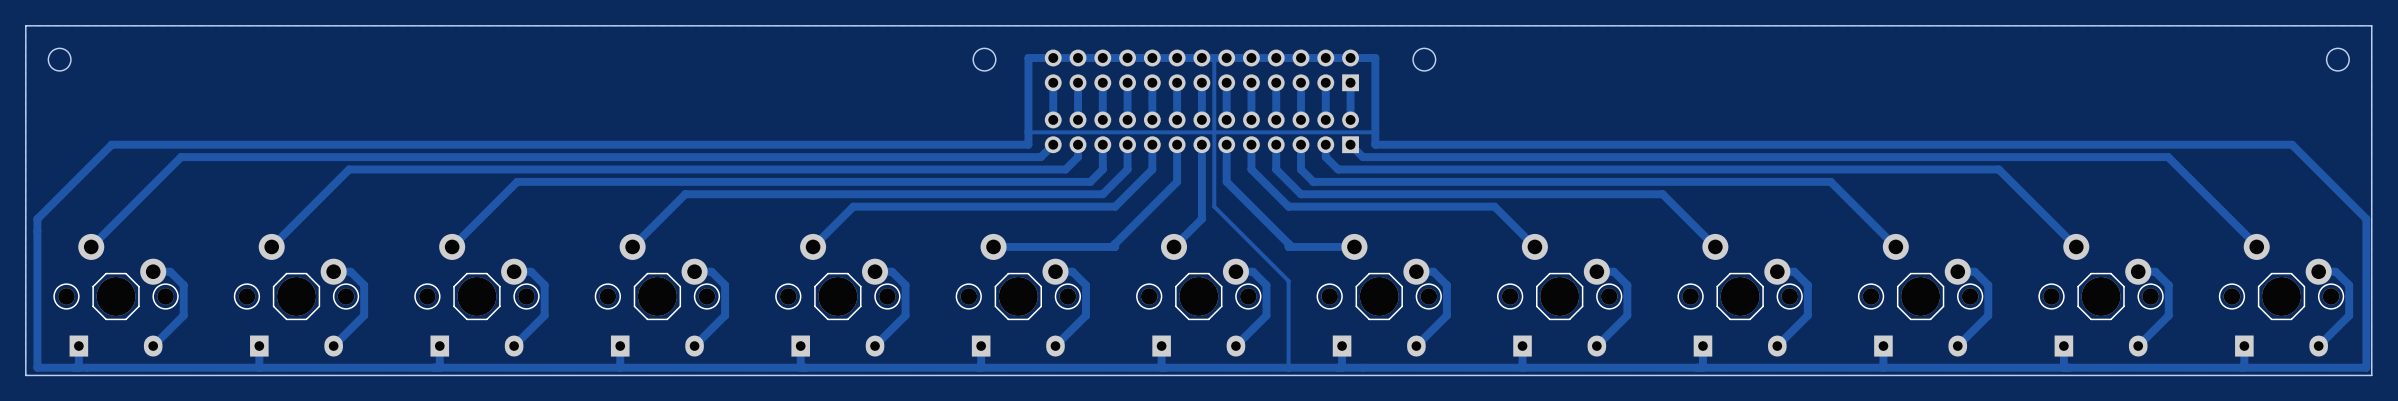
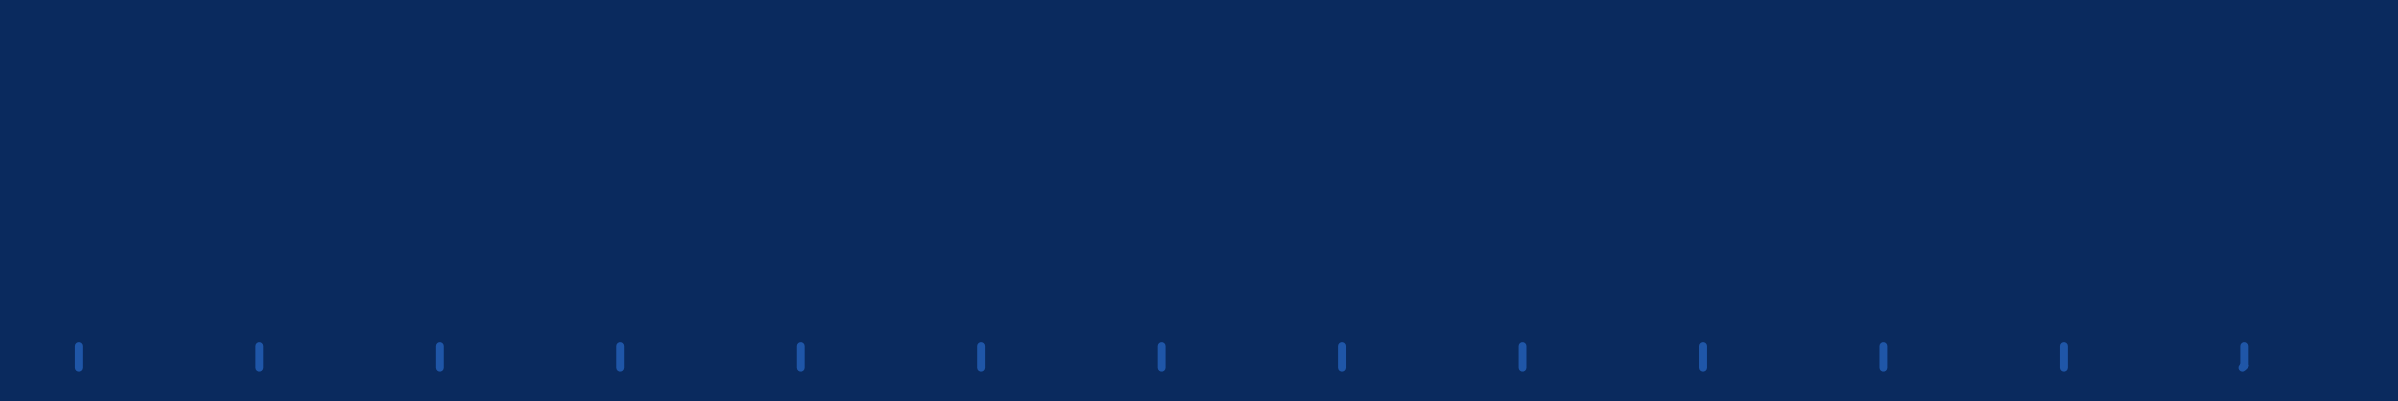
board edge: (2371, 25) (25, 25) (25, 375) (2371, 375) (2371, 25) -> none
round board edge: [47, 47, 72, 72] -> none
round board edge: [972, 47, 997, 72] -> none
round board edge: [1412, 47, 1437, 72] -> none
round board edge: [2325, 47, 2350, 72] -> none
track: (1214, 58) (1214, 206) (1288, 280) (1288, 367) -> none
track: (1375, 58) (1028, 58) (1028, 144) (111, 144) (37, 219) (37, 367) (2366, 367) (2366, 219) (2292, 144) (1375, 144) (1375, 58) -> none
part: (1201, 70) -> none
track: (1053, 82) (1053, 119) -> none
track: (1078, 82) (1078, 119) -> none
track: (1102, 82) (1102, 119) -> none
track: (1127, 82) (1127, 119) -> none
track: (1152, 82) (1152, 119) -> none
track: (1177, 82) (1177, 119) -> none
track: (1201, 82) (1201, 119) -> none
track: (1226, 82) (1226, 119) -> none
track: (1251, 82) (1251, 119) -> none
track: (1276, 82) (1276, 119) -> none
track: (1301, 82) (1301, 119) -> none
track: (1325, 82) (1325, 119) -> none
track: (1350, 82) (1350, 119) -> none
part: (1201, 132) -> none
track: (1375, 132) (1028, 132) -> none
track: (1053, 144) (1040, 157) (181, 157) (91, 246) -> none
track: (1078, 144) (1078, 157) (1065, 169) (349, 169) (271, 246) -> none
track: (1102, 144) (1102, 169) (1090, 181) (517, 181) (452, 246) -> none
track: (1127, 144) (1127, 169) (1102, 194) (685, 194) (632, 246) -> none
track: (1152, 144) (1152, 169) (1115, 206) (853, 206) (813, 246) -> none
track: (1177, 144) (1177, 181) (1112, 246) -> none
track: (1201, 144) (1201, 219) (1174, 246) -> none
track: (1226, 144) (1226, 181) (1291, 246) -> none
track: (1251, 144) (1251, 169) (1288, 206) (1494, 206) (1534, 246) -> none
track: (1276, 144) (1276, 169) (1301, 194) (1662, 194) (1715, 246) -> none
track: (1301, 144) (1301, 169) (1313, 181) (1830, 181) (1895, 246) -> none
track: (1325, 144) (1325, 157) (1338, 169) (1998, 169) (2076, 246) -> none
track: (1350, 144) (1362, 157) (2168, 157) (2256, 246) -> none
track: (1115, 243) (1115, 246) (993, 246) -> none
track: (1288, 243) (1288, 246) (1354, 246) -> none
track: (153, 271) (170, 271) (183, 285) (183, 315) (153, 346) -> none
track: (333, 271) (350, 271) (364, 285) (364, 315) (333, 346) -> none
track: (514, 271) (531, 271) (544, 285) (544, 315) (514, 346) -> none
track: (694, 271) (711, 271) (725, 285) (725, 315) (694, 346) -> none
track: (875, 271) (892, 271) (905, 285) (905, 315) (875, 346) -> none
track: (1055, 271) (1072, 271) (1085, 285) (1085, 315) (1055, 346) -> none
track: (1235, 271) (1252, 271) (1266, 285) (1266, 315) (1235, 346) -> none
track: (1416, 271) (1433, 271) (1446, 285) (1446, 315) (1416, 346) -> none
track: (1596, 271) (1613, 271) (1627, 285) (1627, 315) (1596, 346) -> none
track: (1777, 271) (1794, 271) (1807, 285) (1807, 315) (1777, 346) -> none
track: (1957, 271) (1974, 271) (1988, 285) (1988, 315) (1957, 346) -> none
track: (2138, 271) (2155, 271) (2168, 285) (2168, 315) (2138, 346) -> none
track: (2318, 271) (2335, 271) (2349, 285) (2349, 315) (2318, 346) -> none
part: (116, 295) -> none
part: (296, 295) -> none
part: (476, 295) -> none
part: (657, 295) -> none
part: (837, 295) -> none
part: (1018, 295) -> none
part: (1198, 295) -> none
part: (1379, 295) -> none
part: (1559, 295) -> none
part: (1740, 295) -> none
part: (1920, 295) -> none
part: (2101, 295) -> none
part: (2281, 295) -> none

